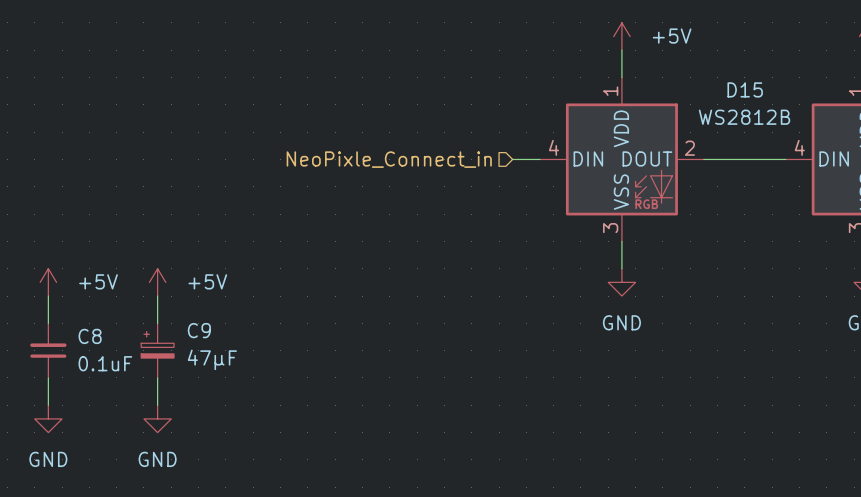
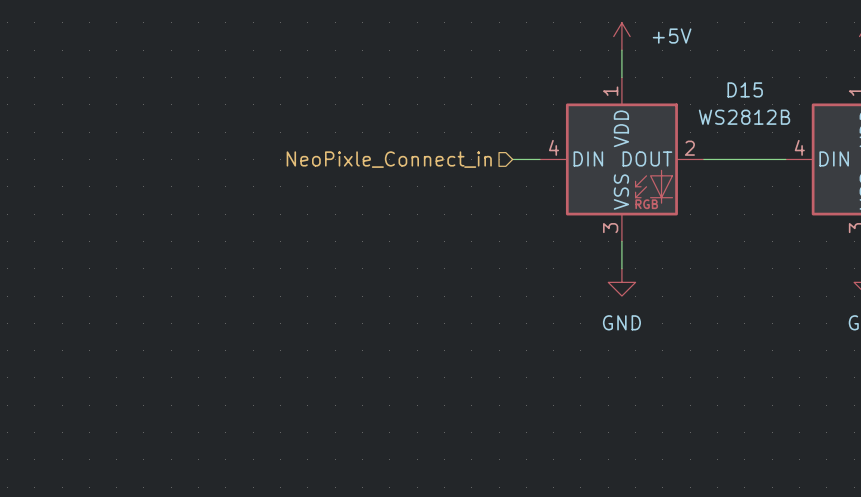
power symbol: +5V (48, 282) -> none
power symbol: +5V (157, 282) -> none
wire: (48, 296) (48, 323) -> none
wire: (157, 296) (157, 323) -> none
C8: 0.1uF (48, 350) -> none
C9: 47μF (157, 350) -> none
wire: (48, 377) (48, 405) -> none
wire: (157, 377) (157, 405) -> none
power symbol: GND (48, 418) -> none
power symbol: GND (157, 418) -> none

